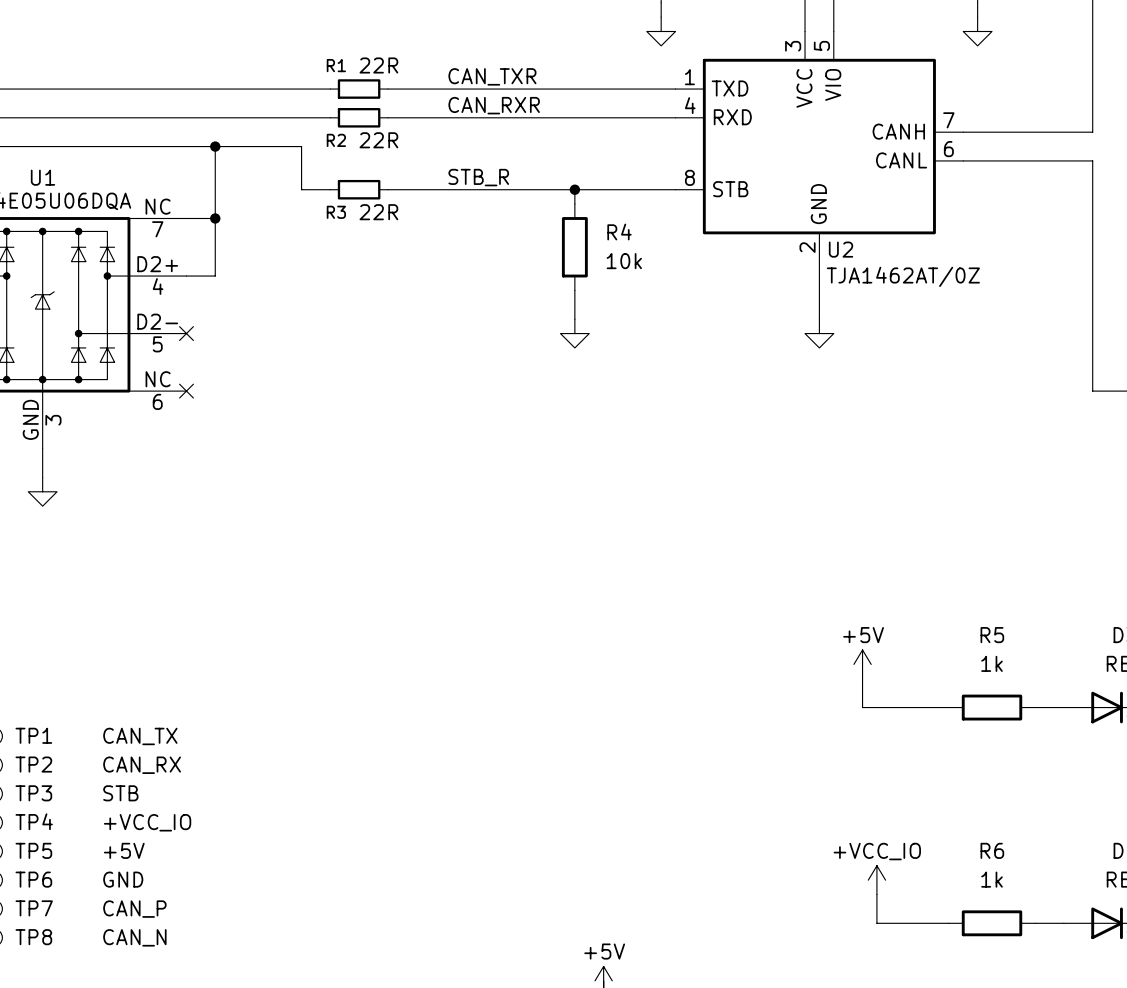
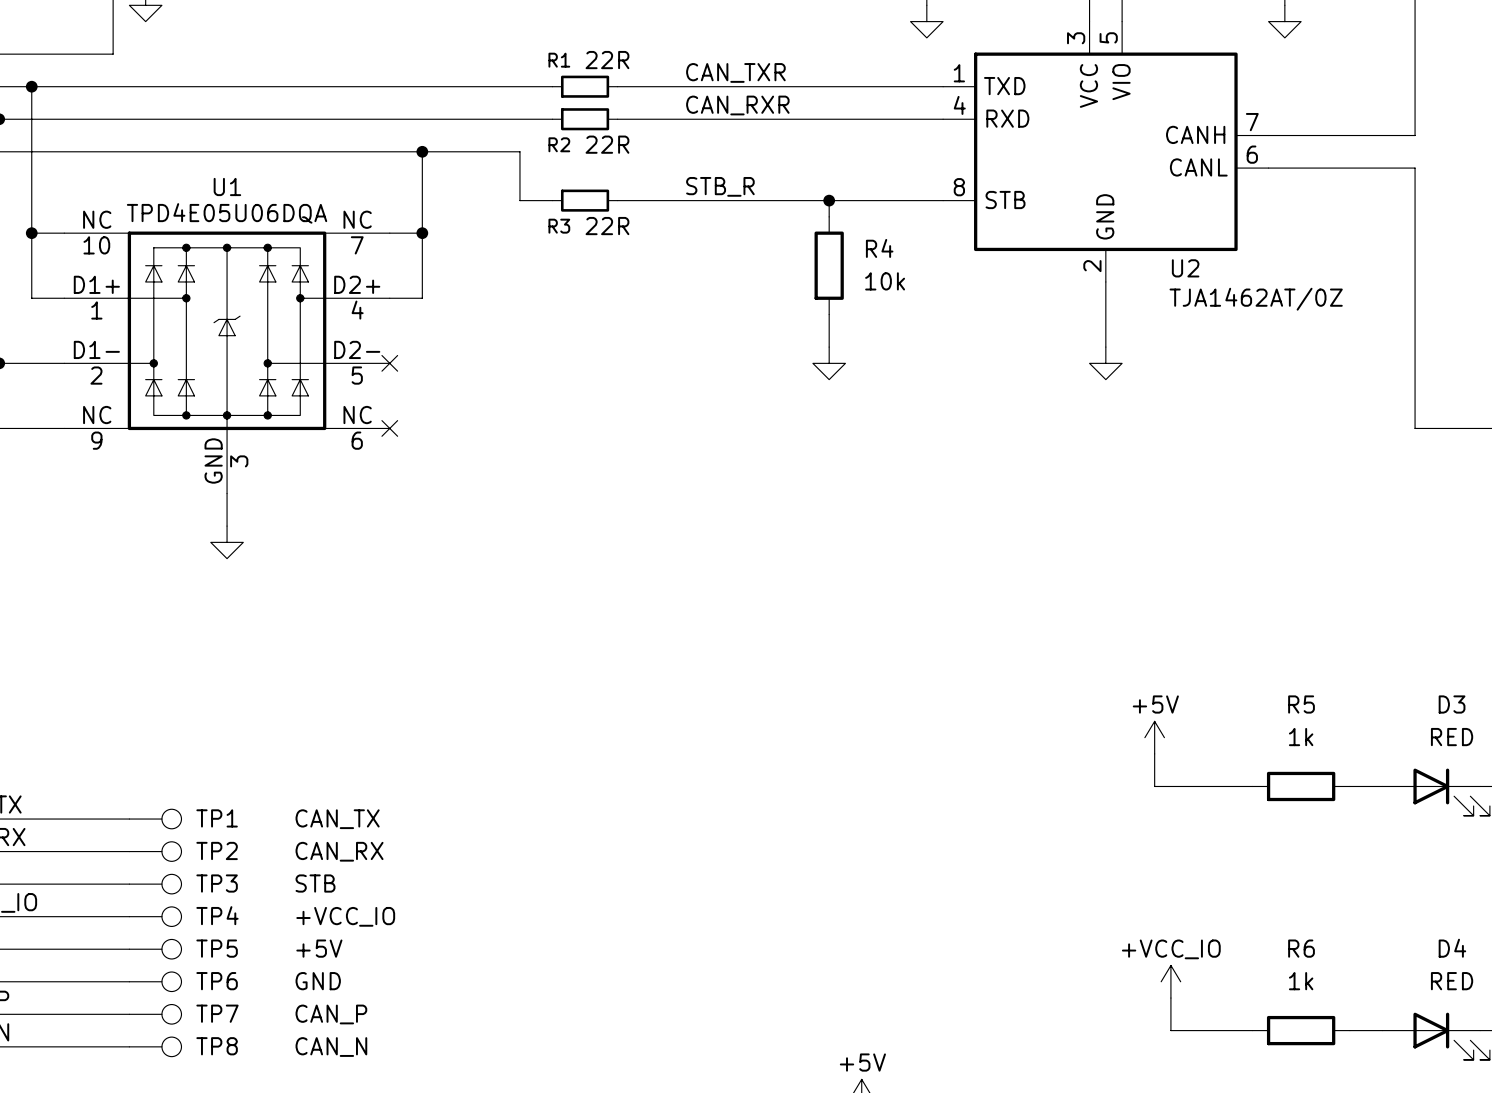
U2 name position: U2 (841, 249) -> U2 (1185, 268)
U2 value position: TJA1462AT/0Z (903, 276) -> TJA1462AT/0Z (1256, 299)

